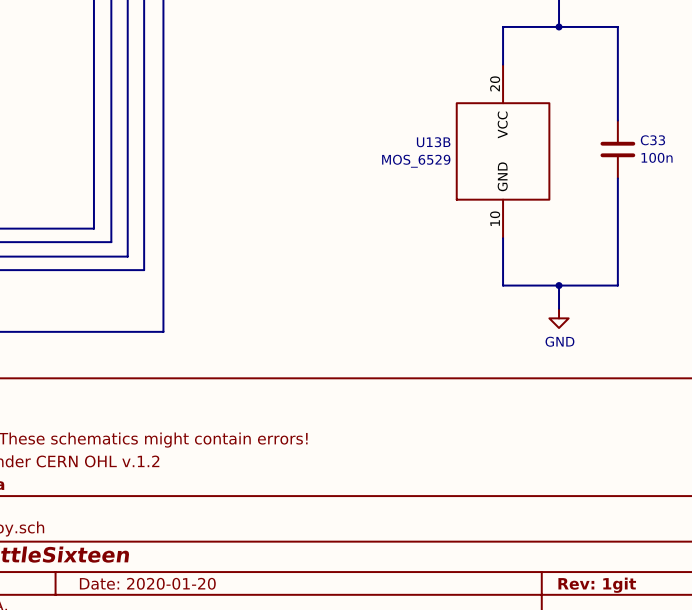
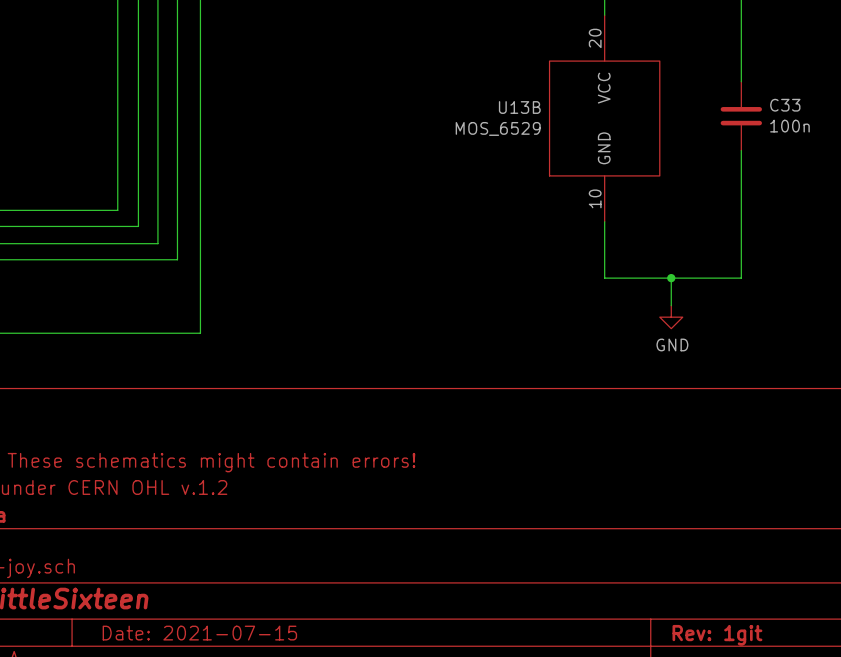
title block: Date: 2020-01-20 (147, 583) -> Date: 2021-07-15 (199, 633)

